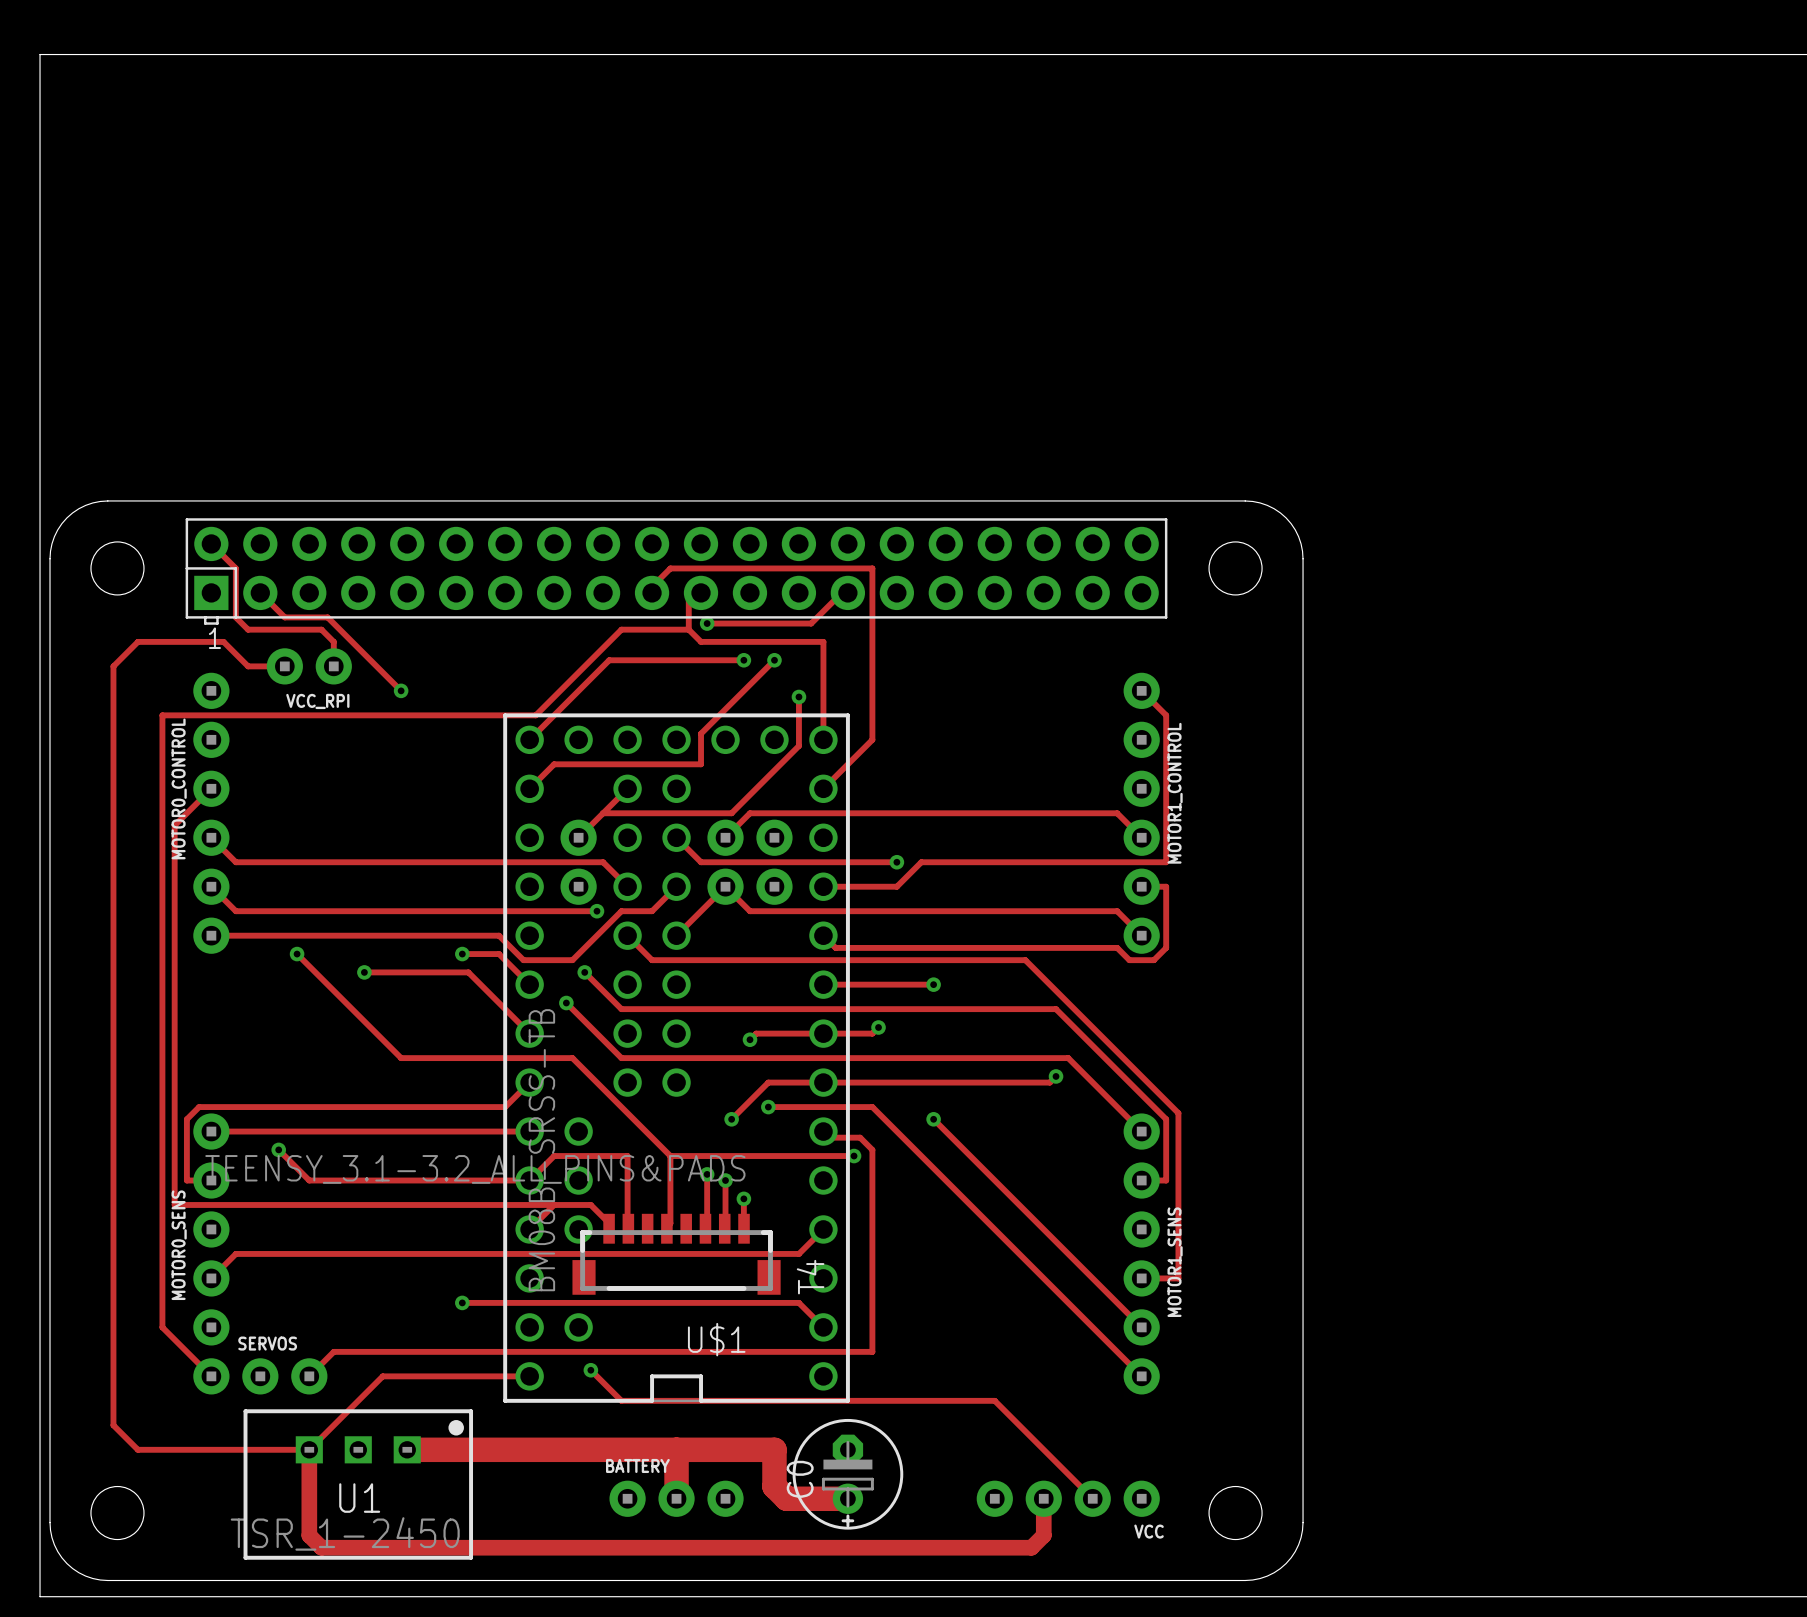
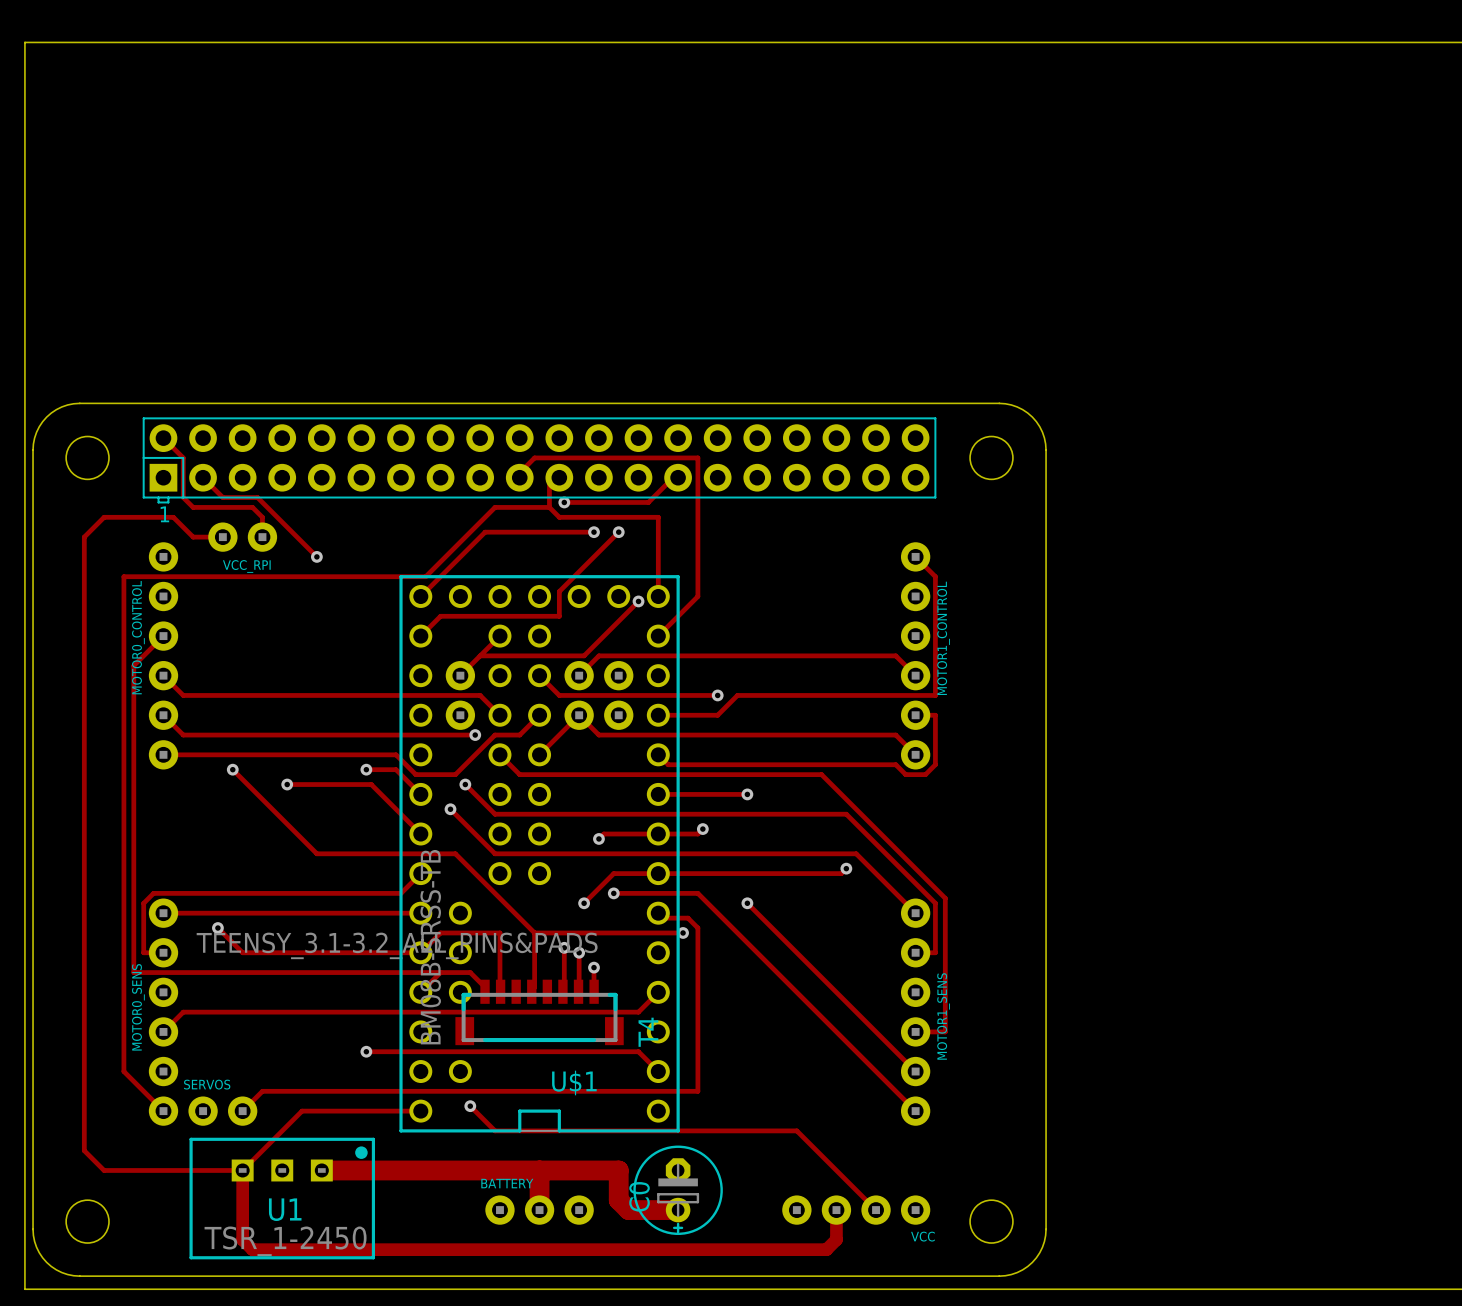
track: (798, 696) (798, 745) -> none
via position: (798, 696) -> (638, 601)

